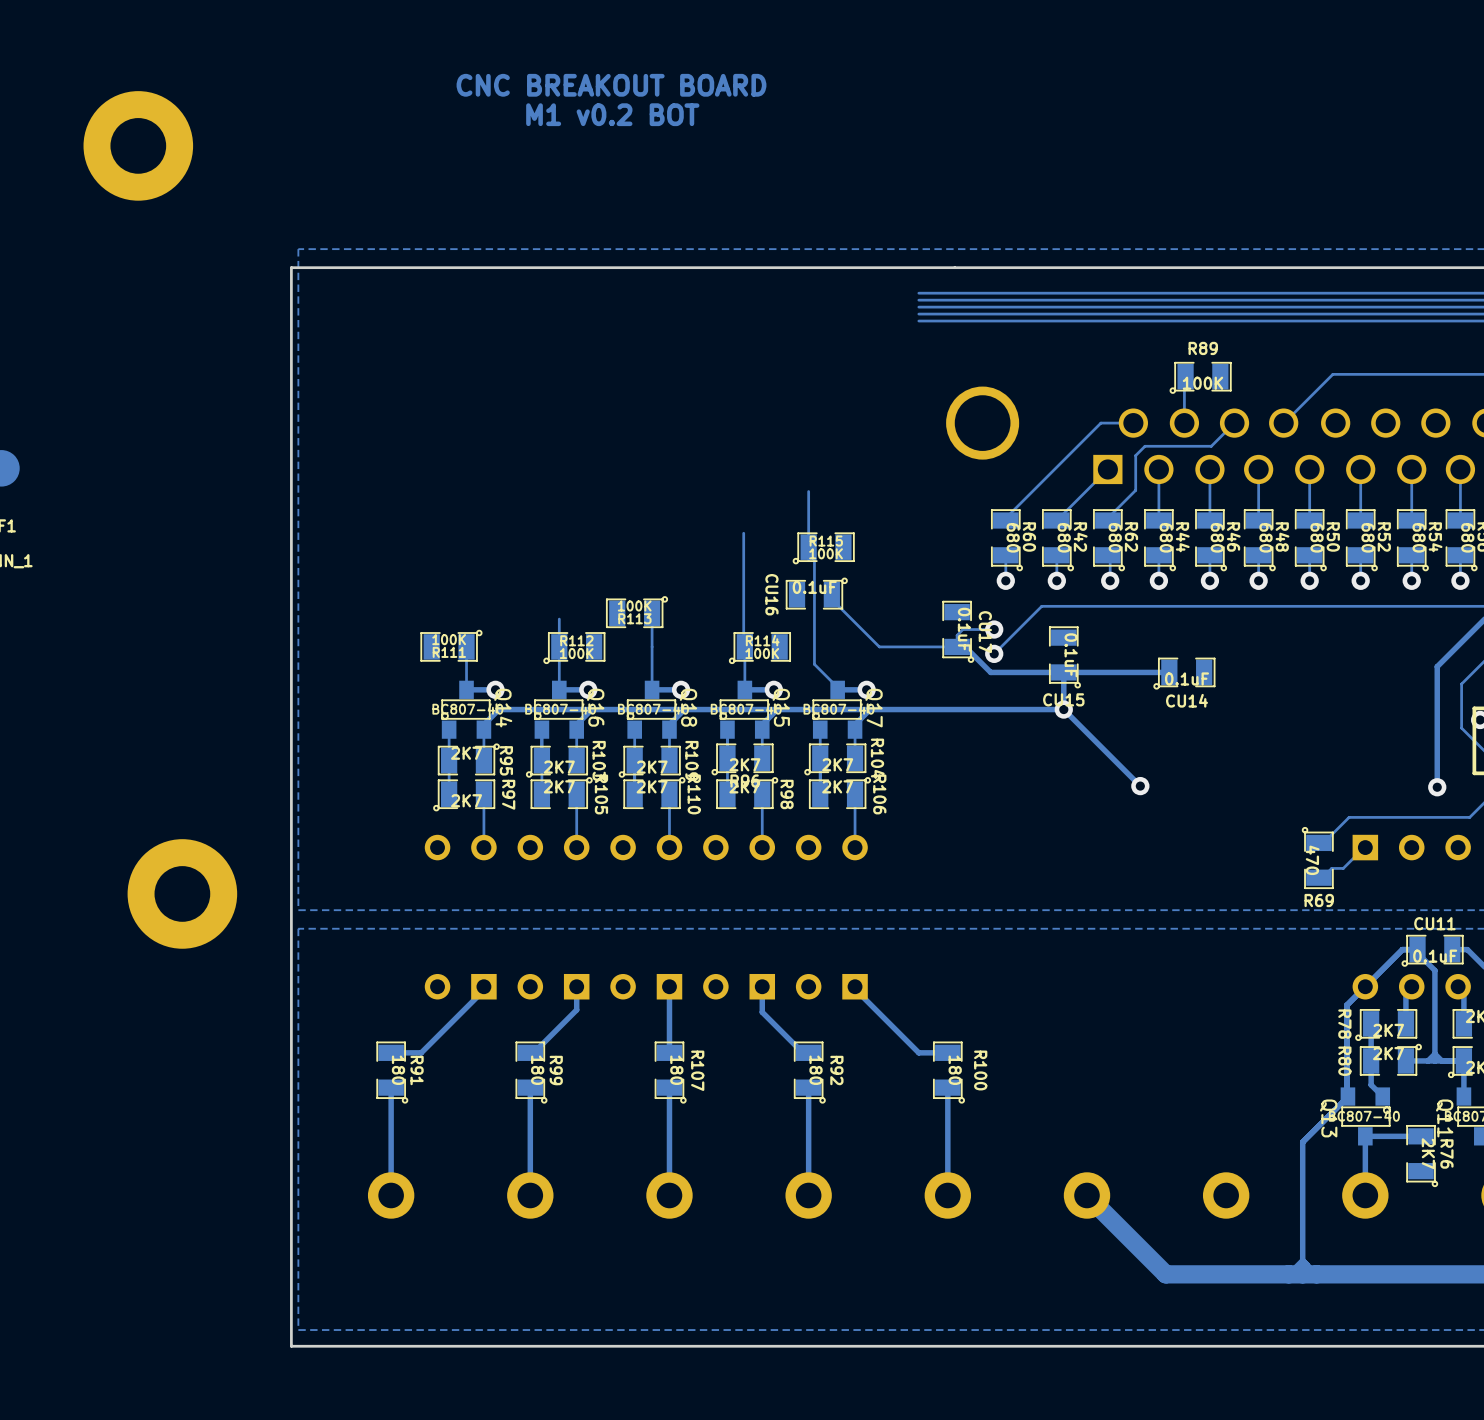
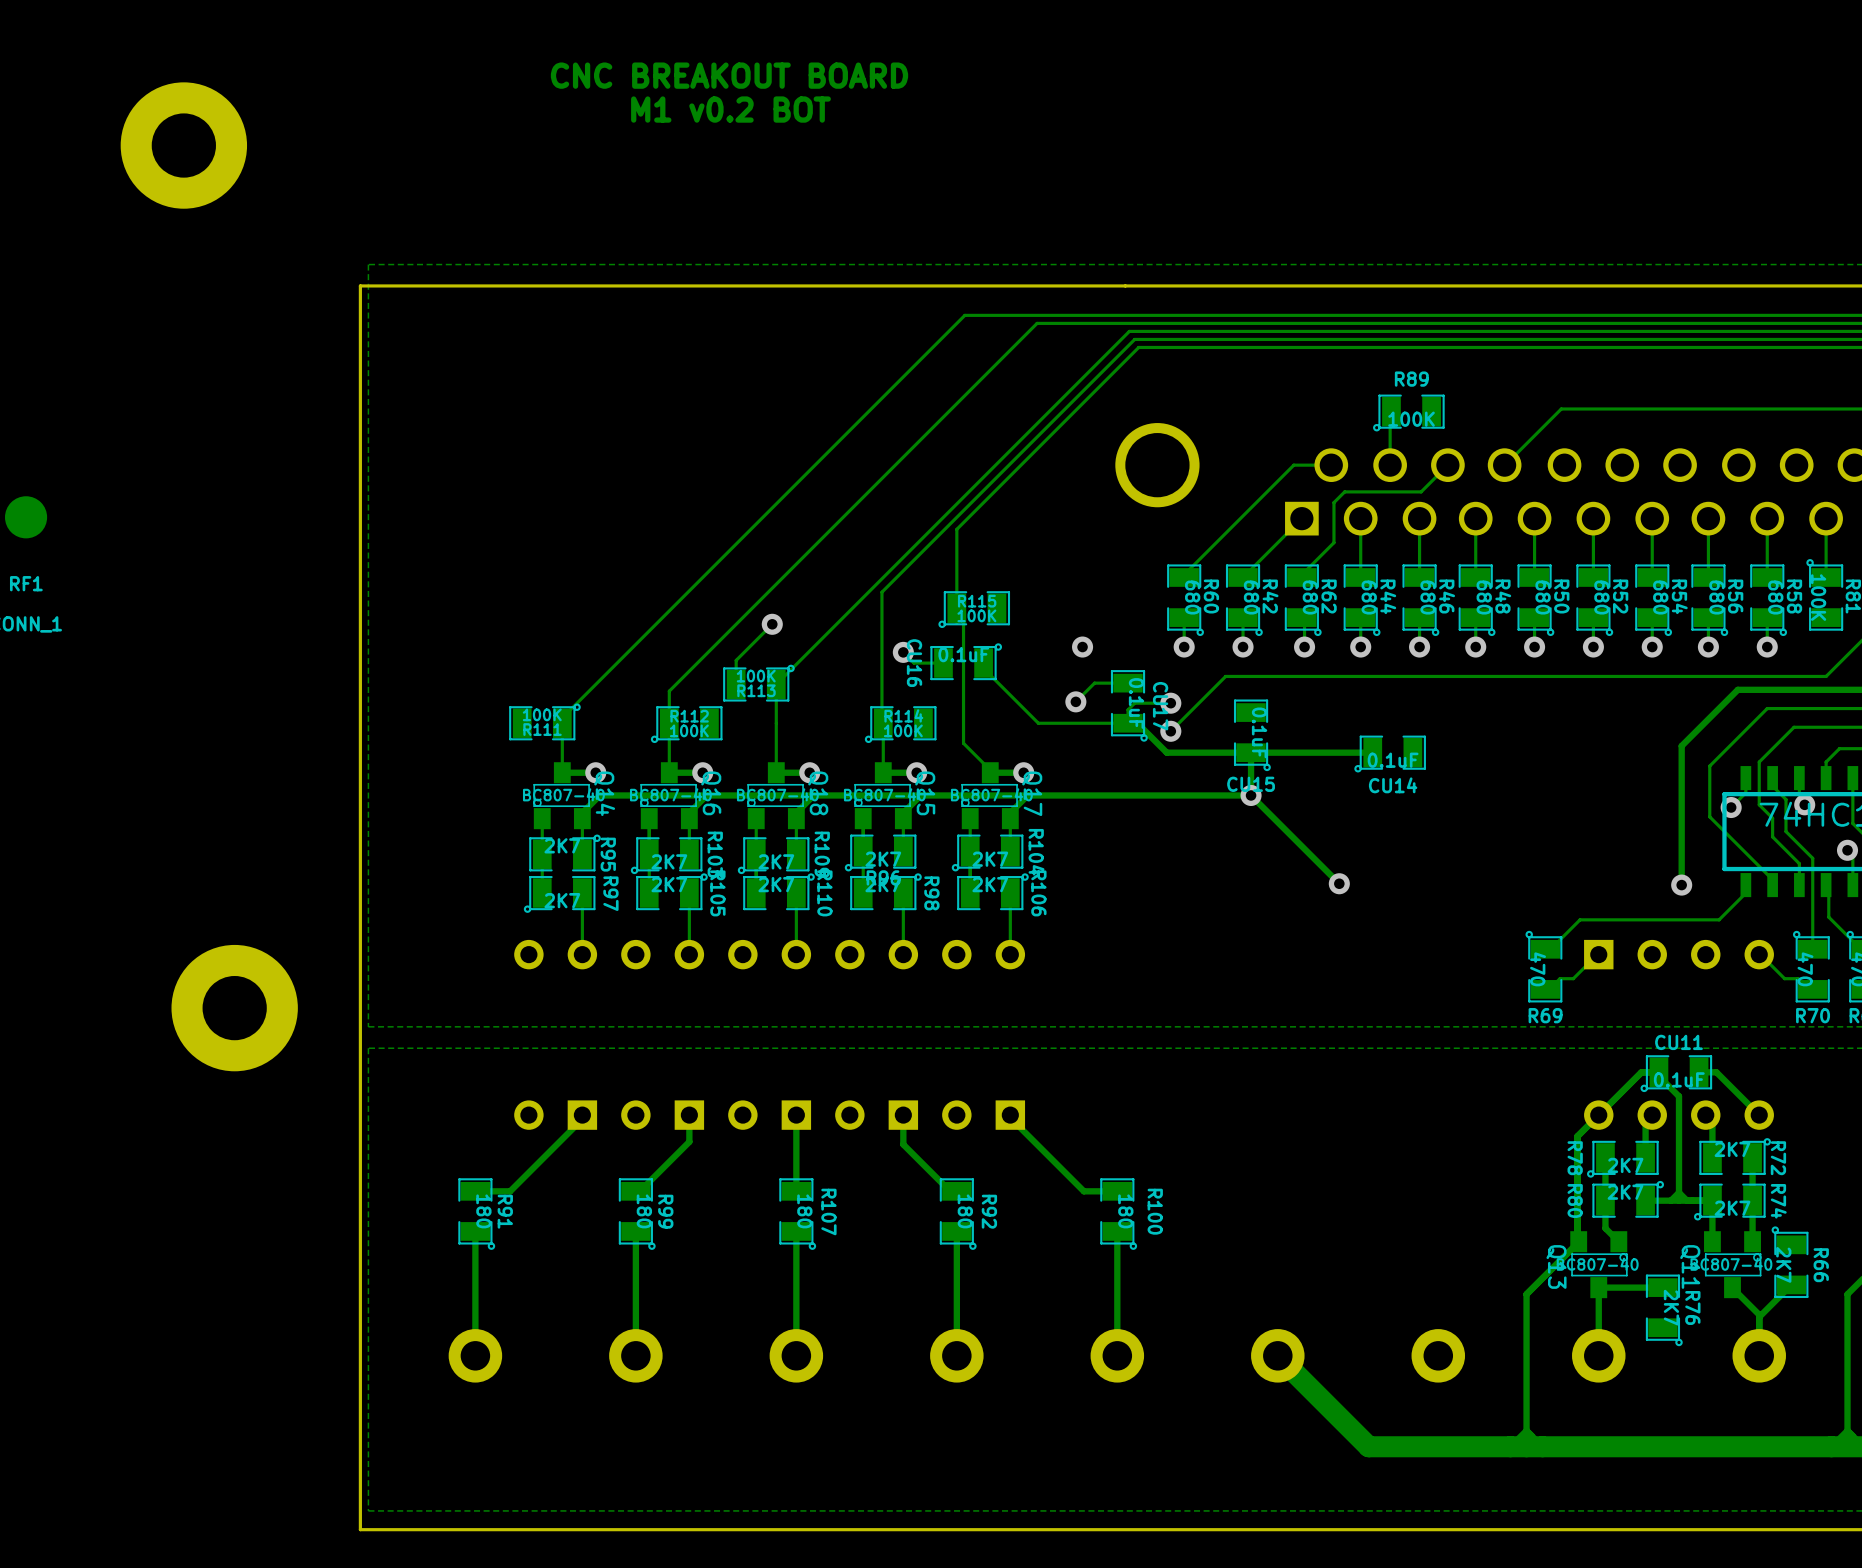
track: none -> (1083, 315) (964, 315) (563, 716)
track: none -> (1083, 323) (1037, 323) (669, 691)
track: (958, 307) (918, 307) -> (1129, 331) (776, 684)
track: (962, 314) (918, 314) -> (1134, 339) (881, 592)
track: (966, 321) (918, 321) -> (1138, 347) (956, 529) (956, 544)
track: none -> (772, 624) (736, 660) (736, 684)
via: none -> (772, 624)
via: none -> (1082, 647)
track: none -> (903, 652) (914, 663) (943, 663)
via: none -> (903, 652)
track: none -> (1128, 683) (1094, 683) (1075, 701)
via: none -> (1075, 701)

